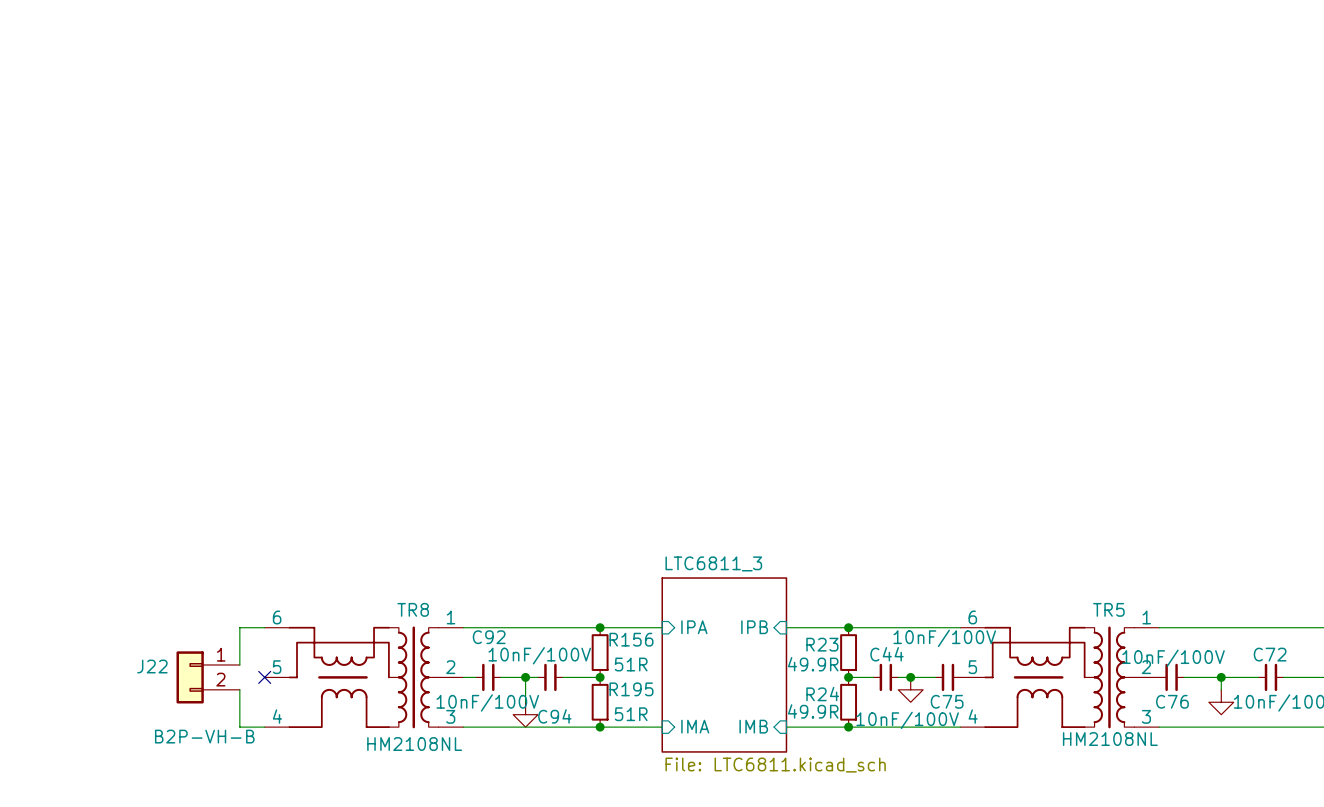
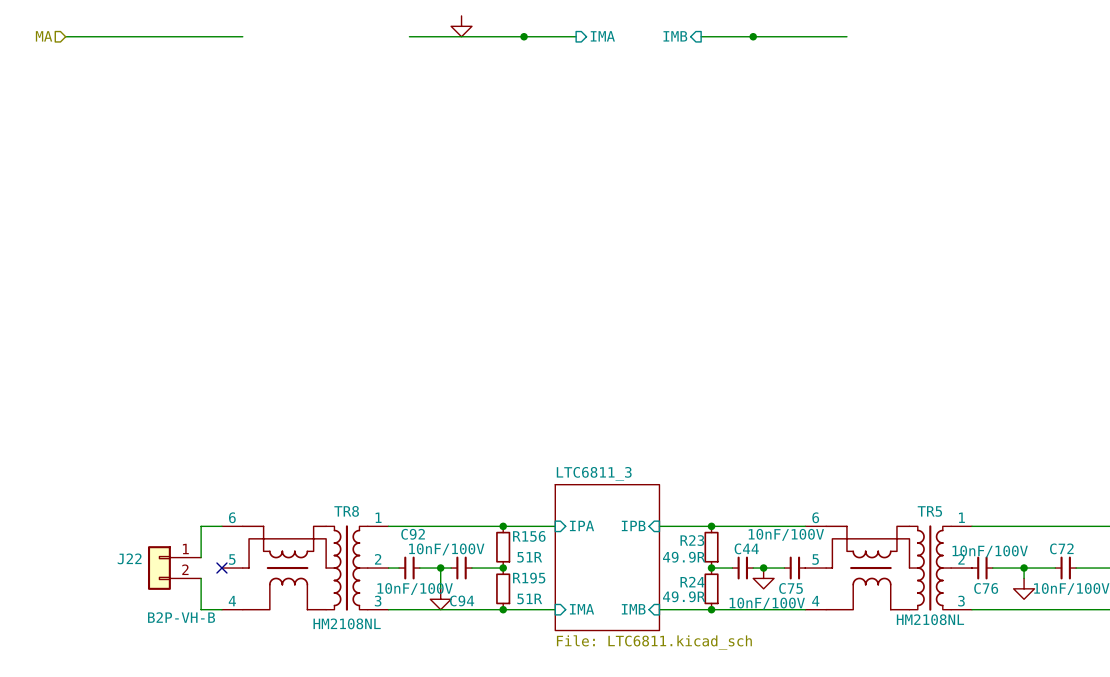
power symbol: none -> (461, 26)
hierarchical label: none -> MA (44, 36)
wire: none -> (65, 36) (242, 36)
wire: none -> (409, 36) (576, 36)
junction: none -> (524, 36)
sheet pin: none -> IMA (602, 36)
sheet pin: none -> IMB (675, 36)
wire: none -> (701, 36) (846, 36)
junction: none -> (753, 36)

